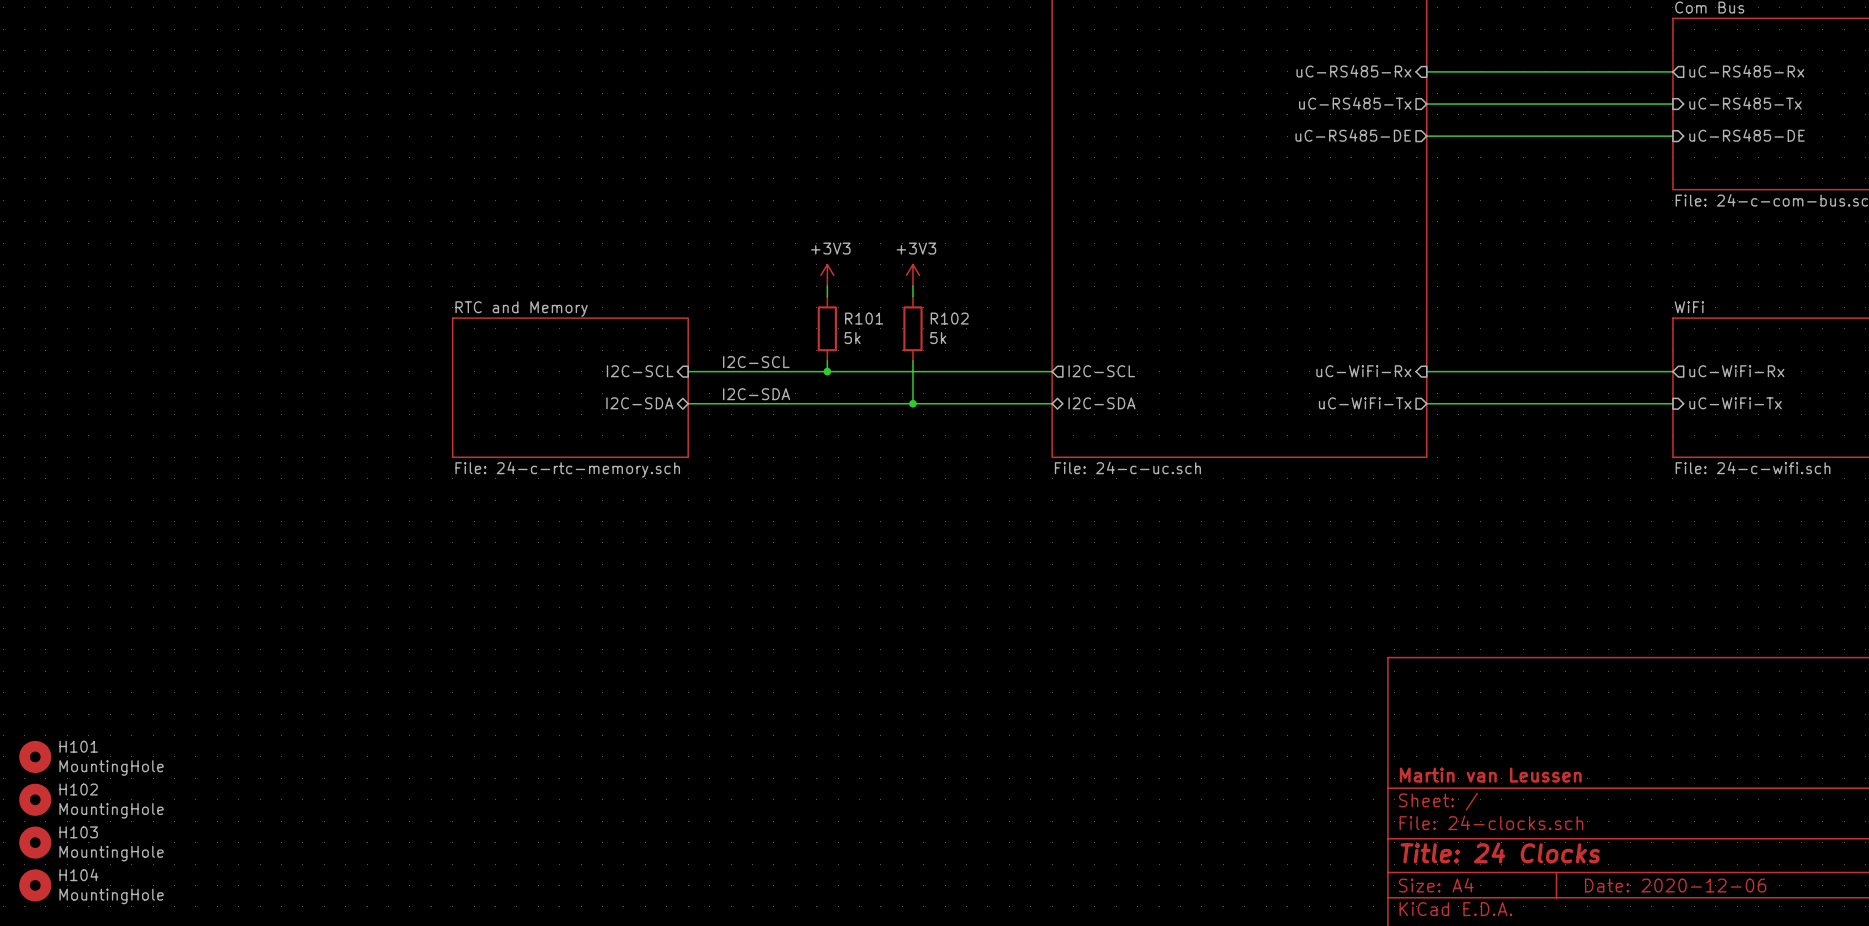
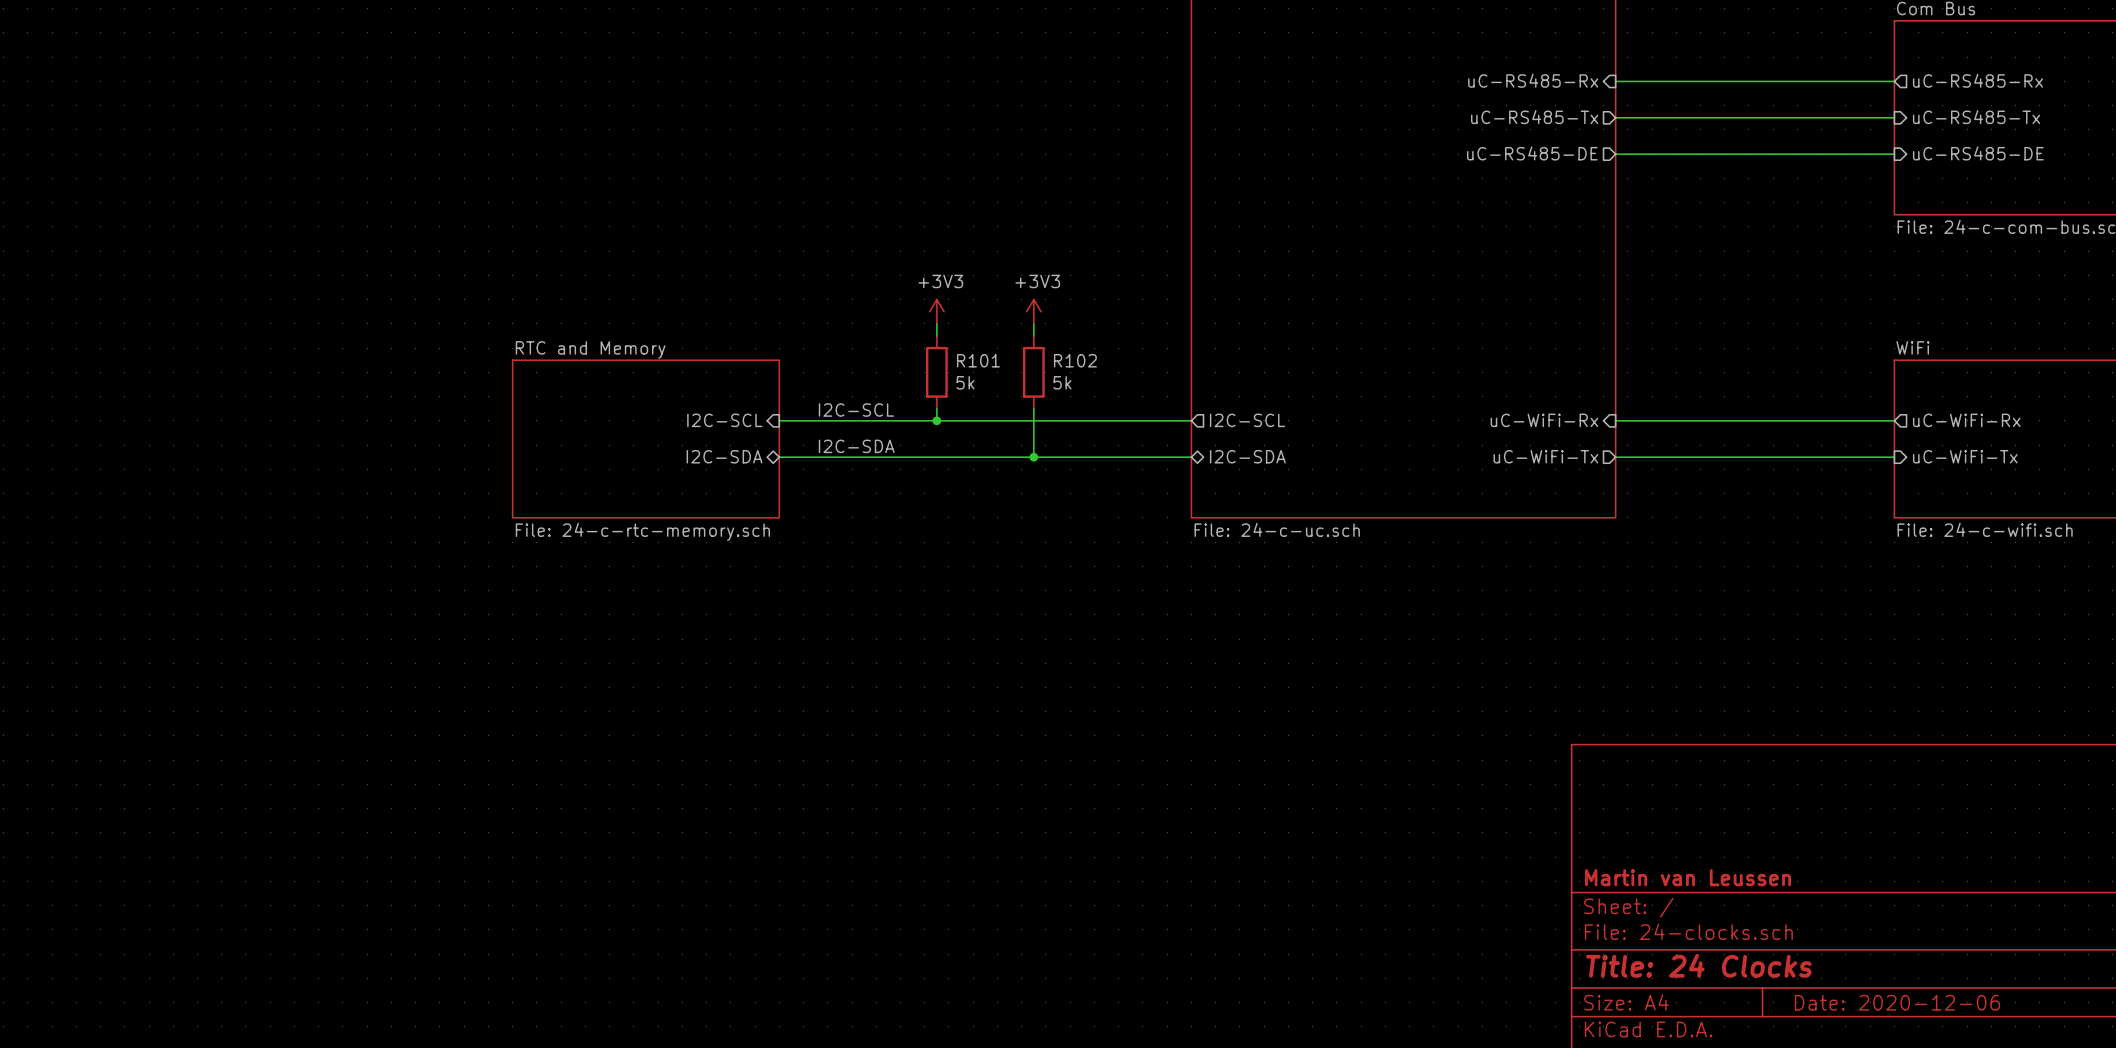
H101: MountingHole (35, 756) -> none
H102: MountingHole (35, 799) -> none
H103: MountingHole (35, 842) -> none
H104: MountingHole (35, 885) -> none

